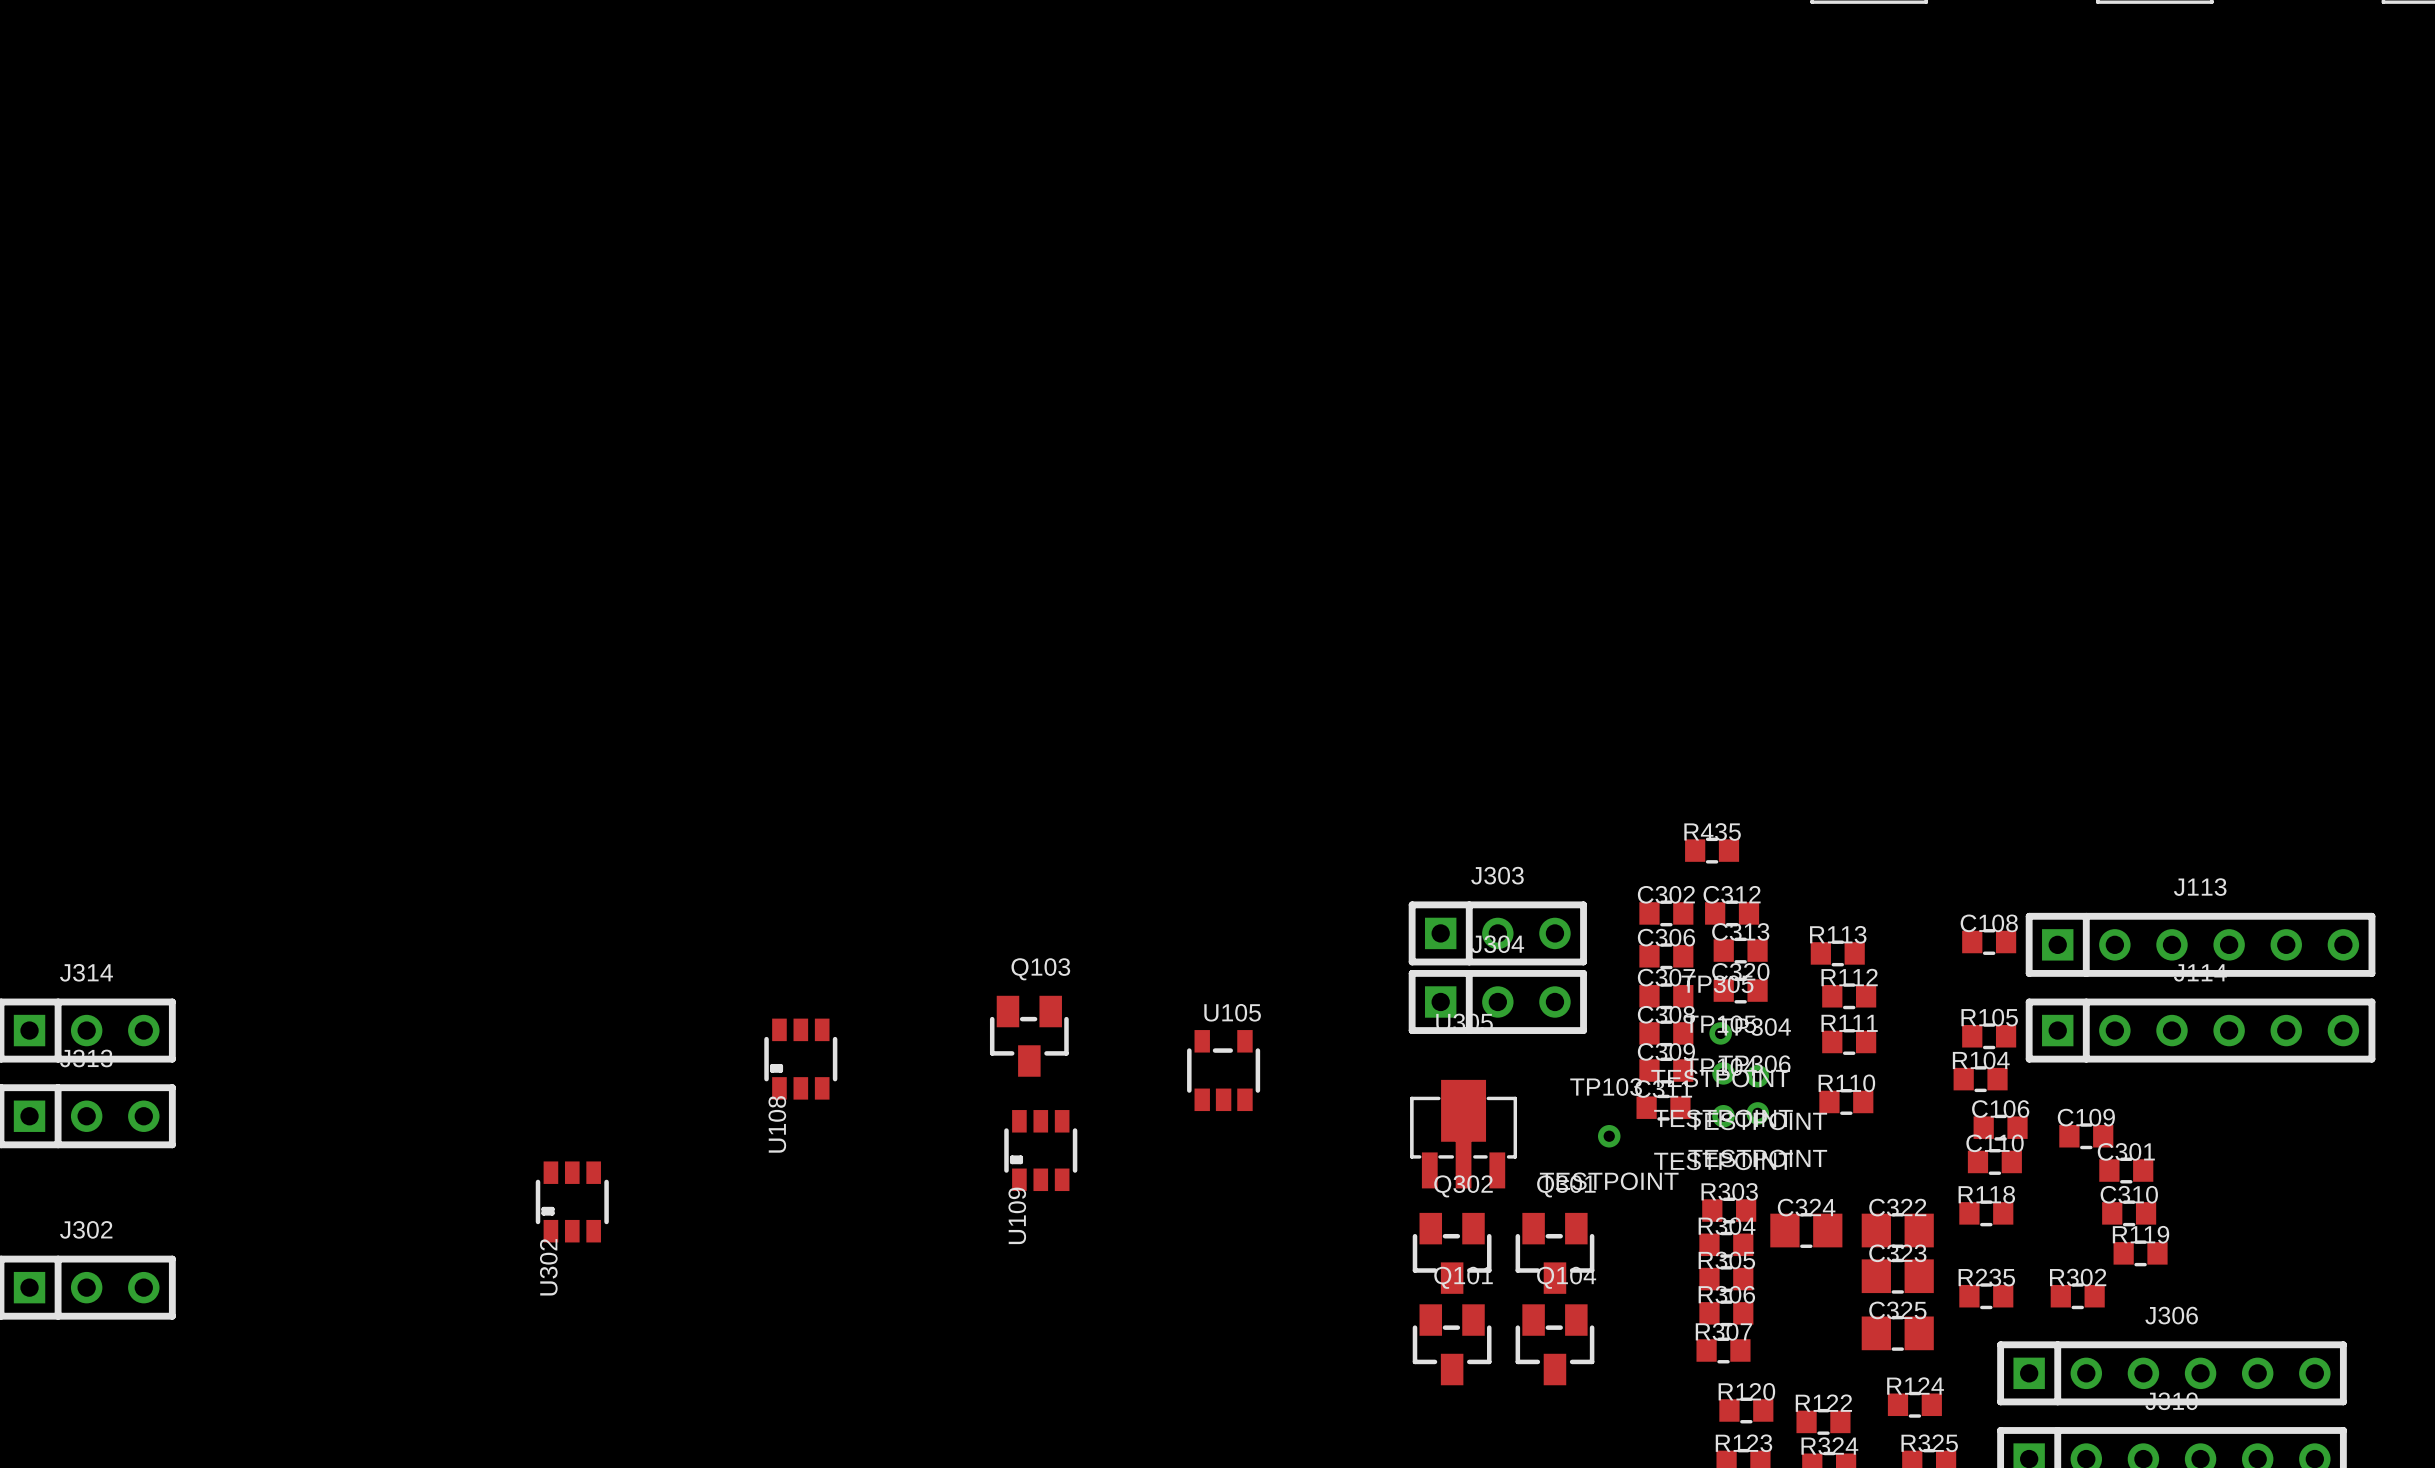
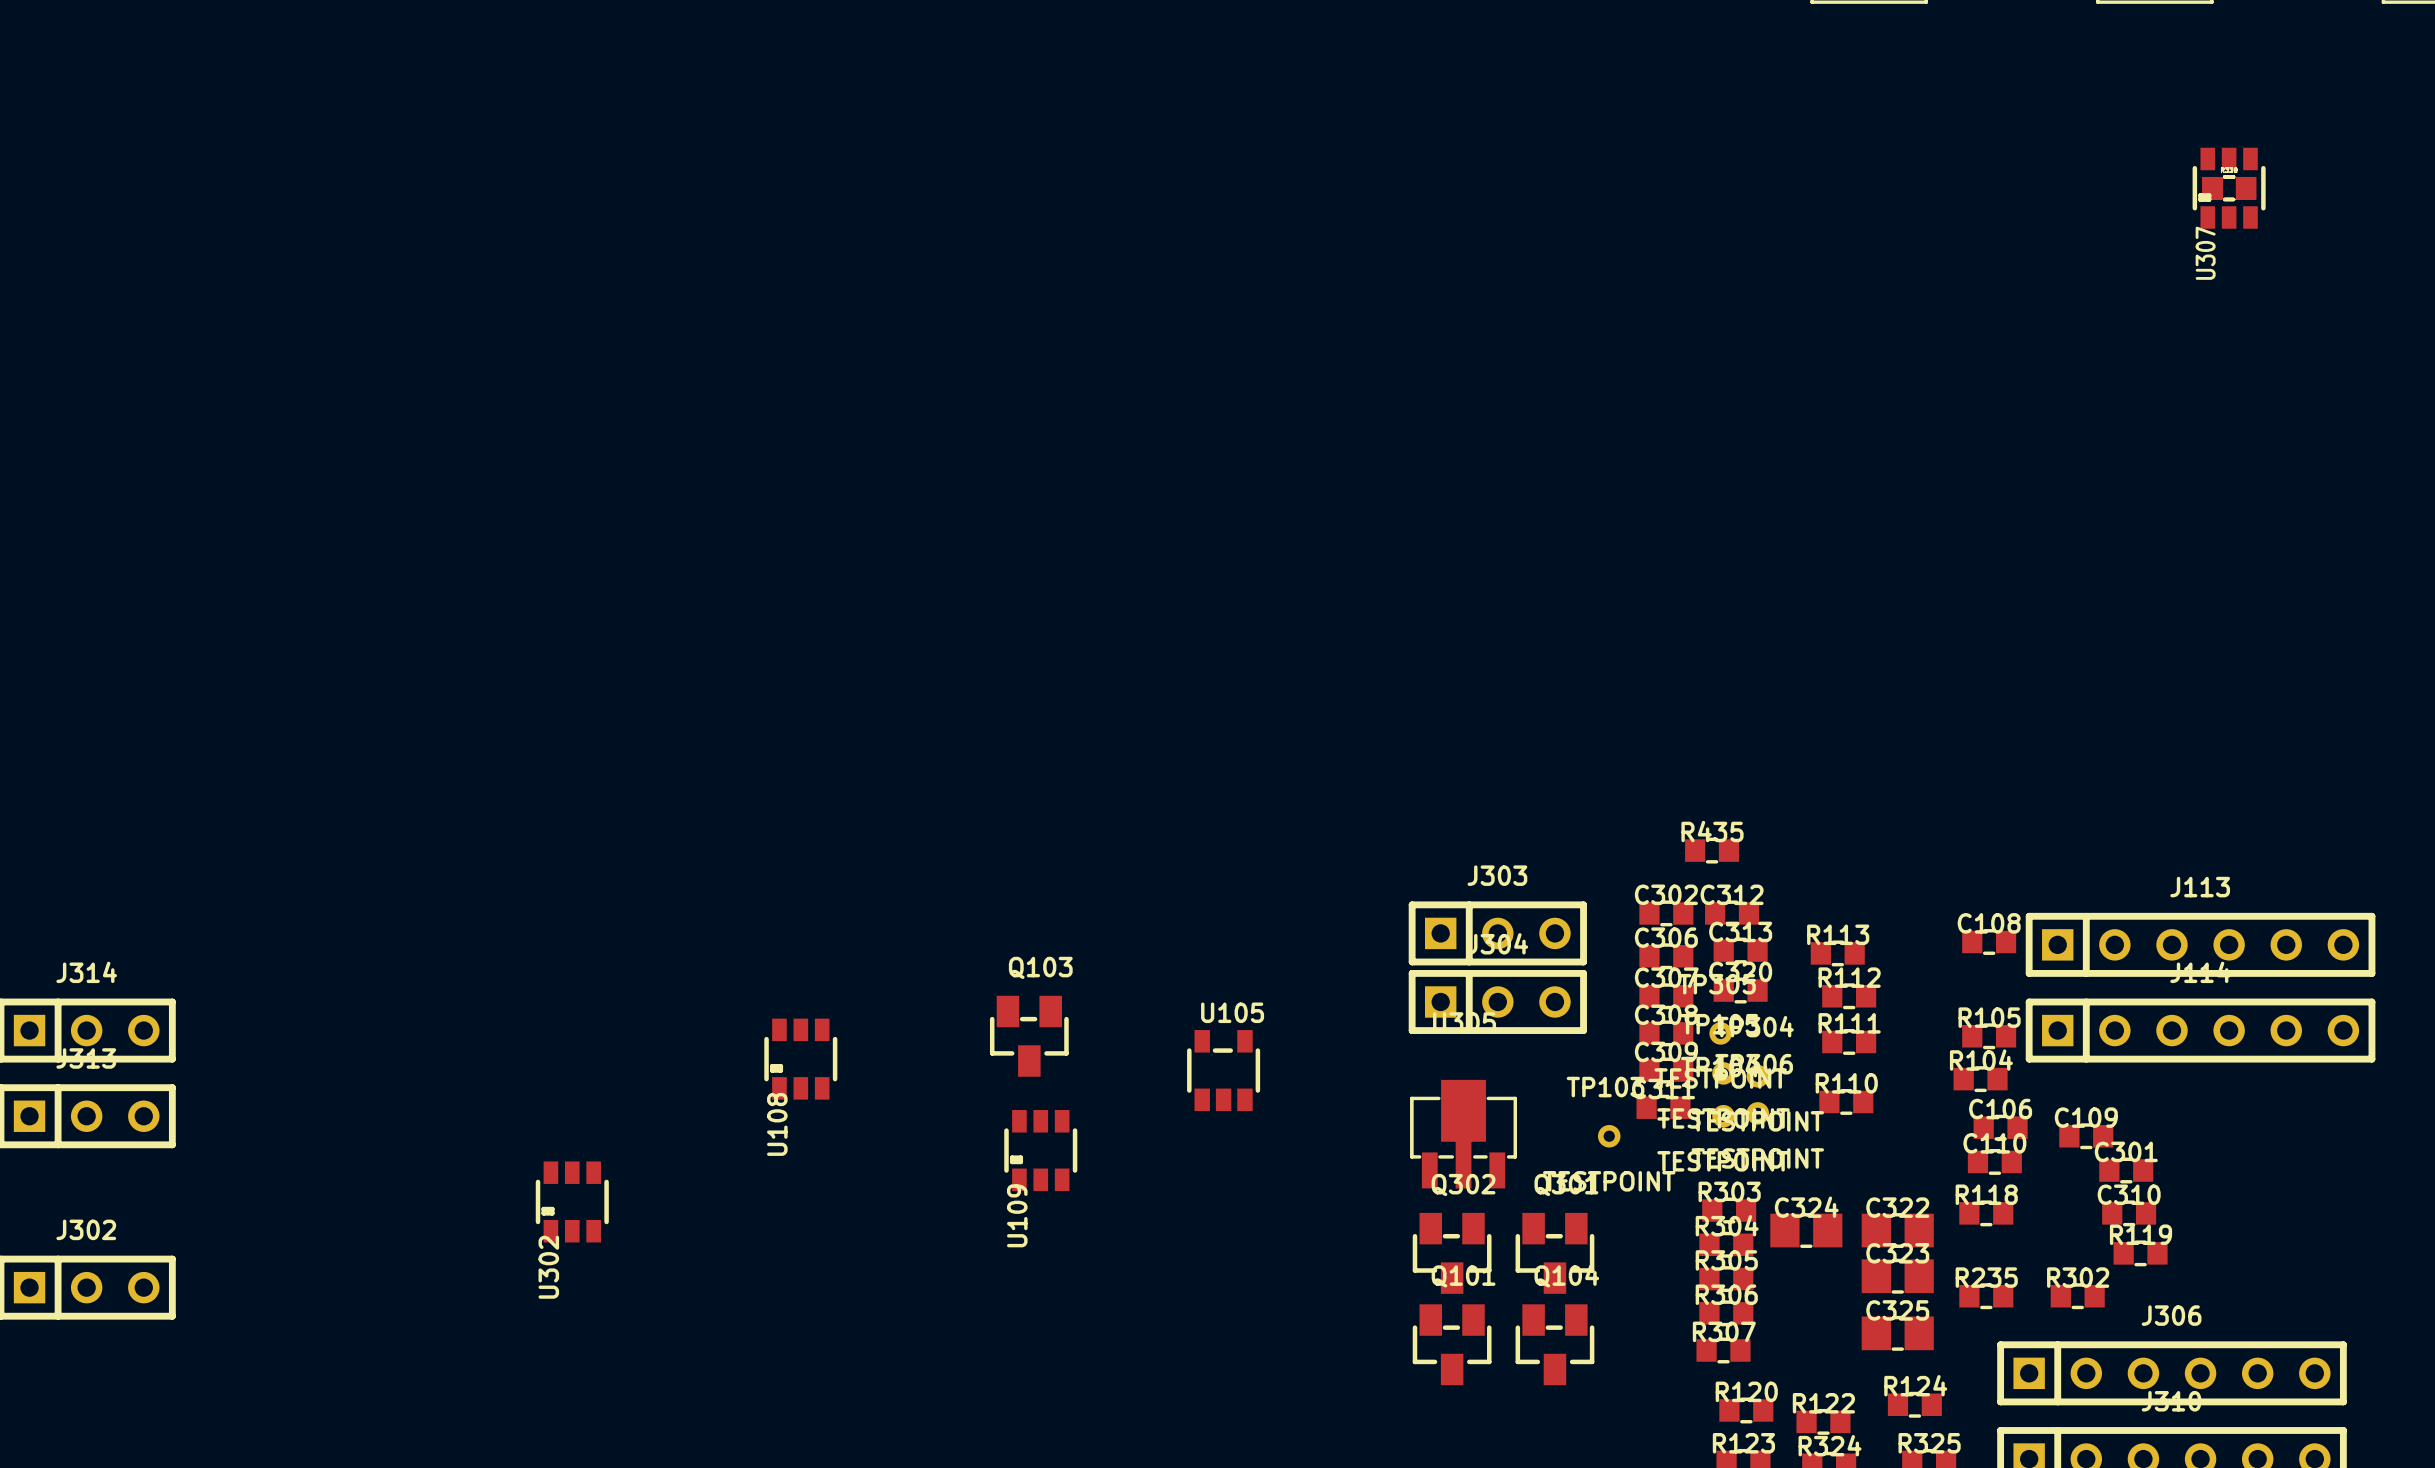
part: none -> (2229, 188)
part: none -> (2229, 188)
part: none -> (2229, 188)
U307: none -> (2229, 188)

